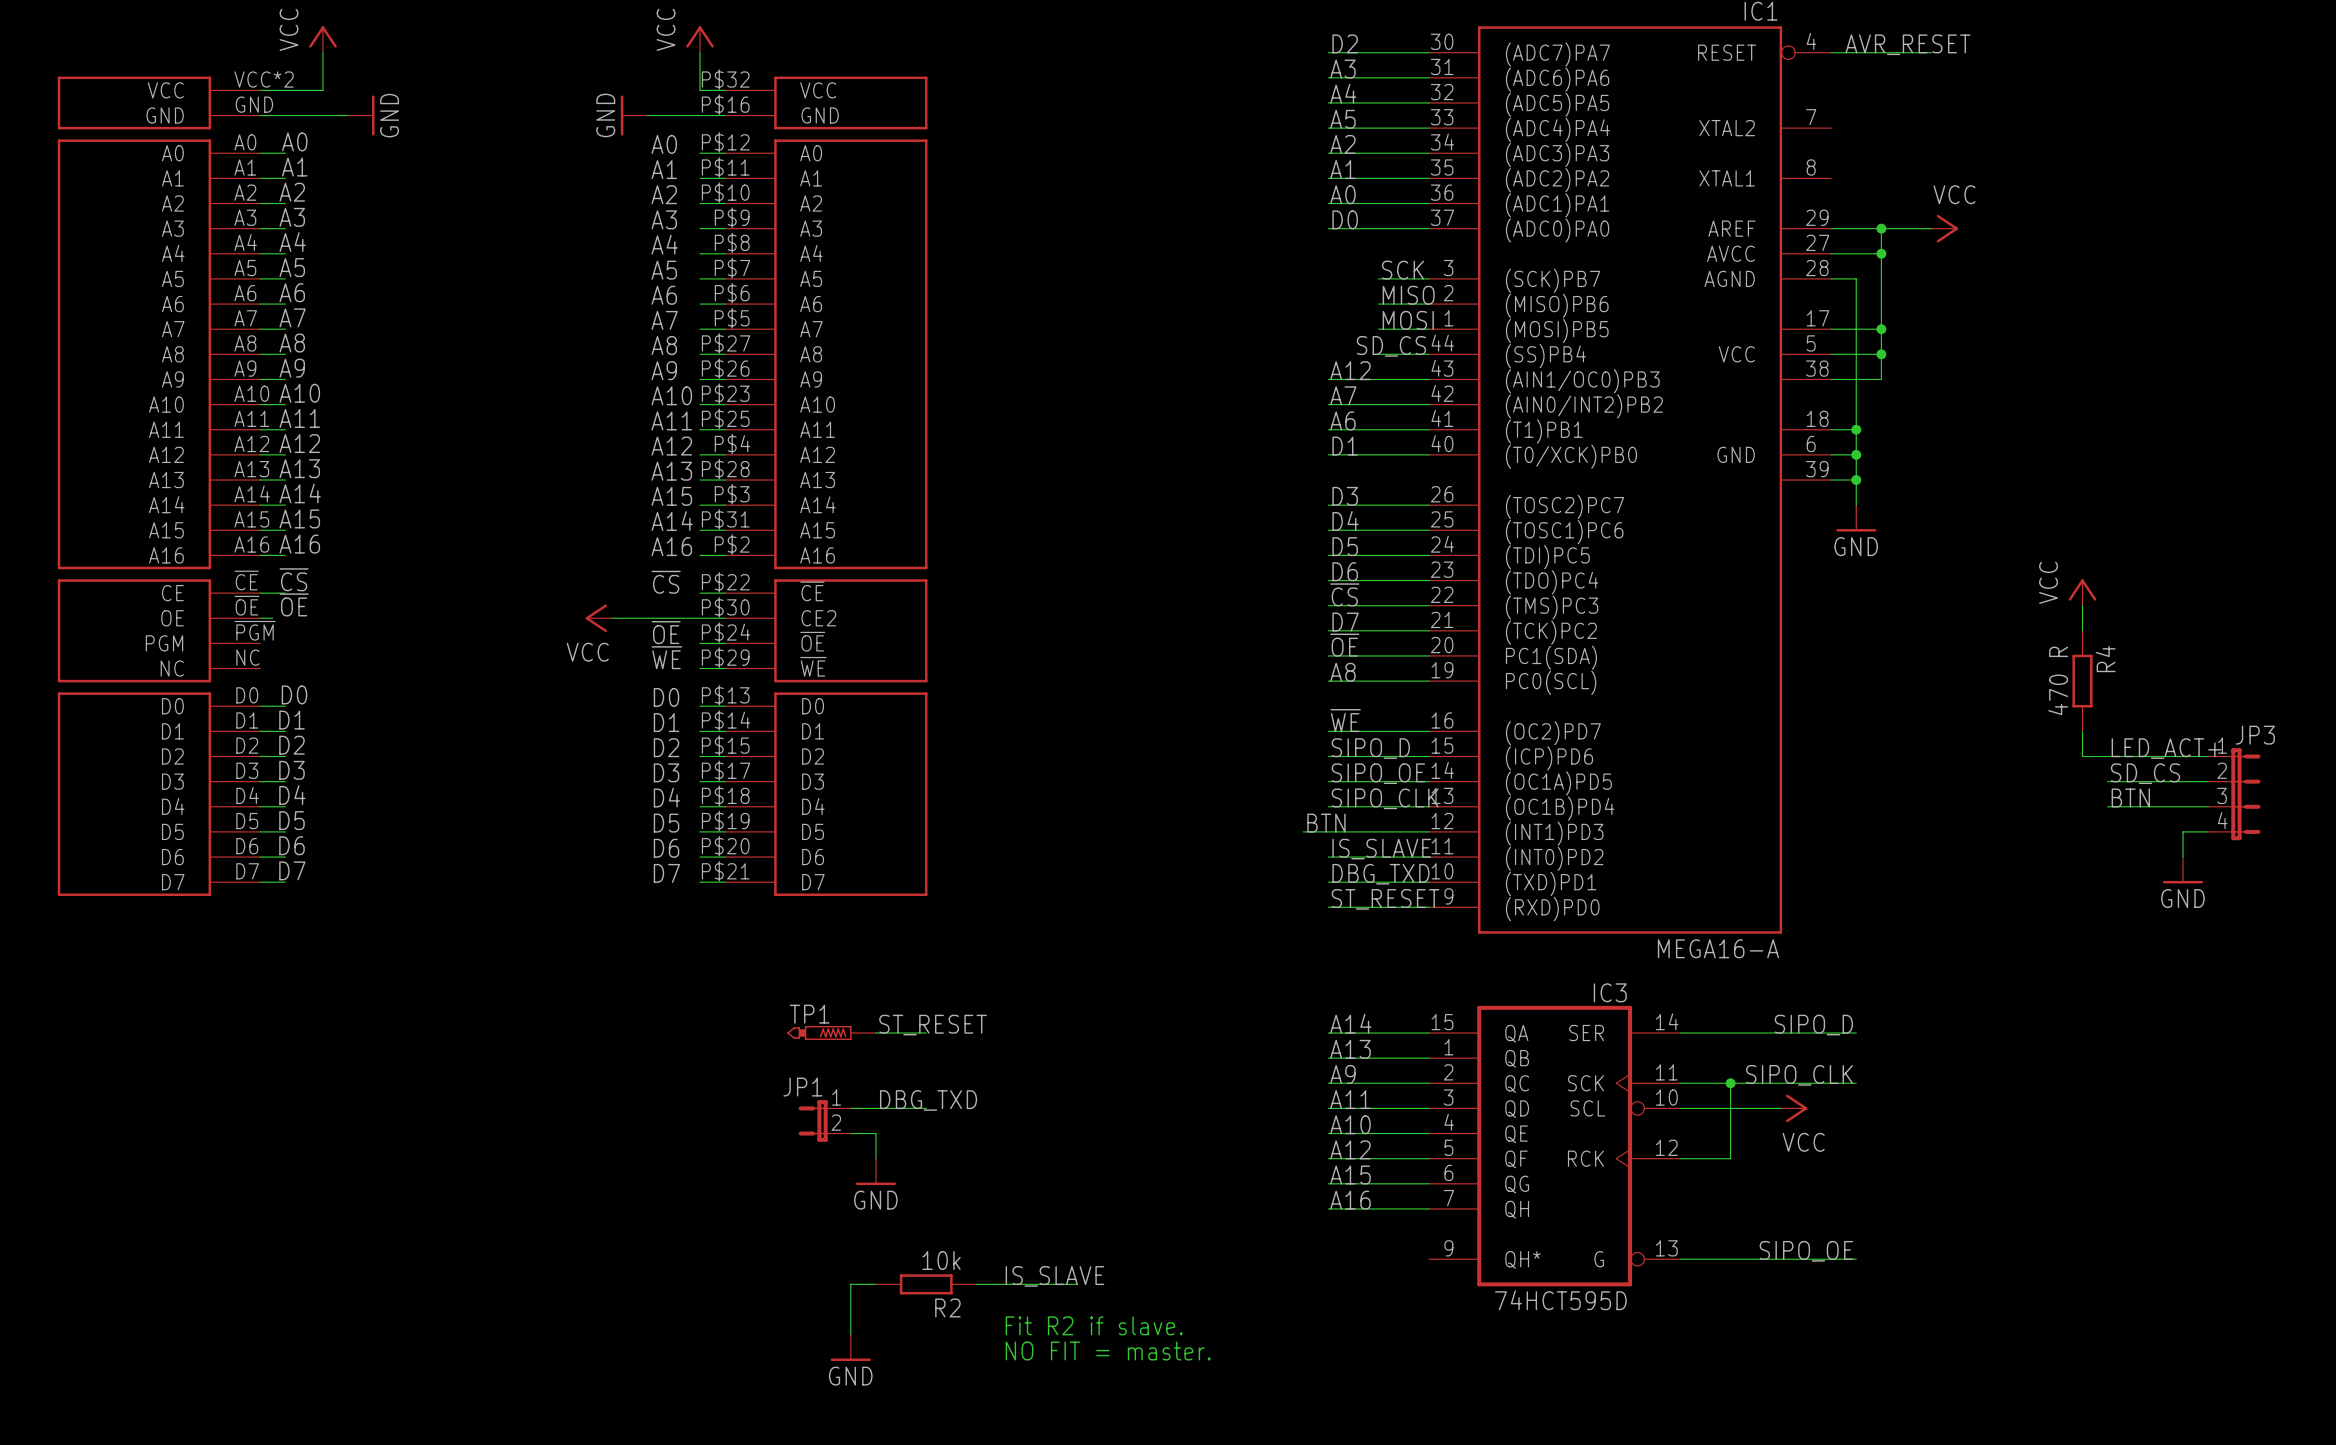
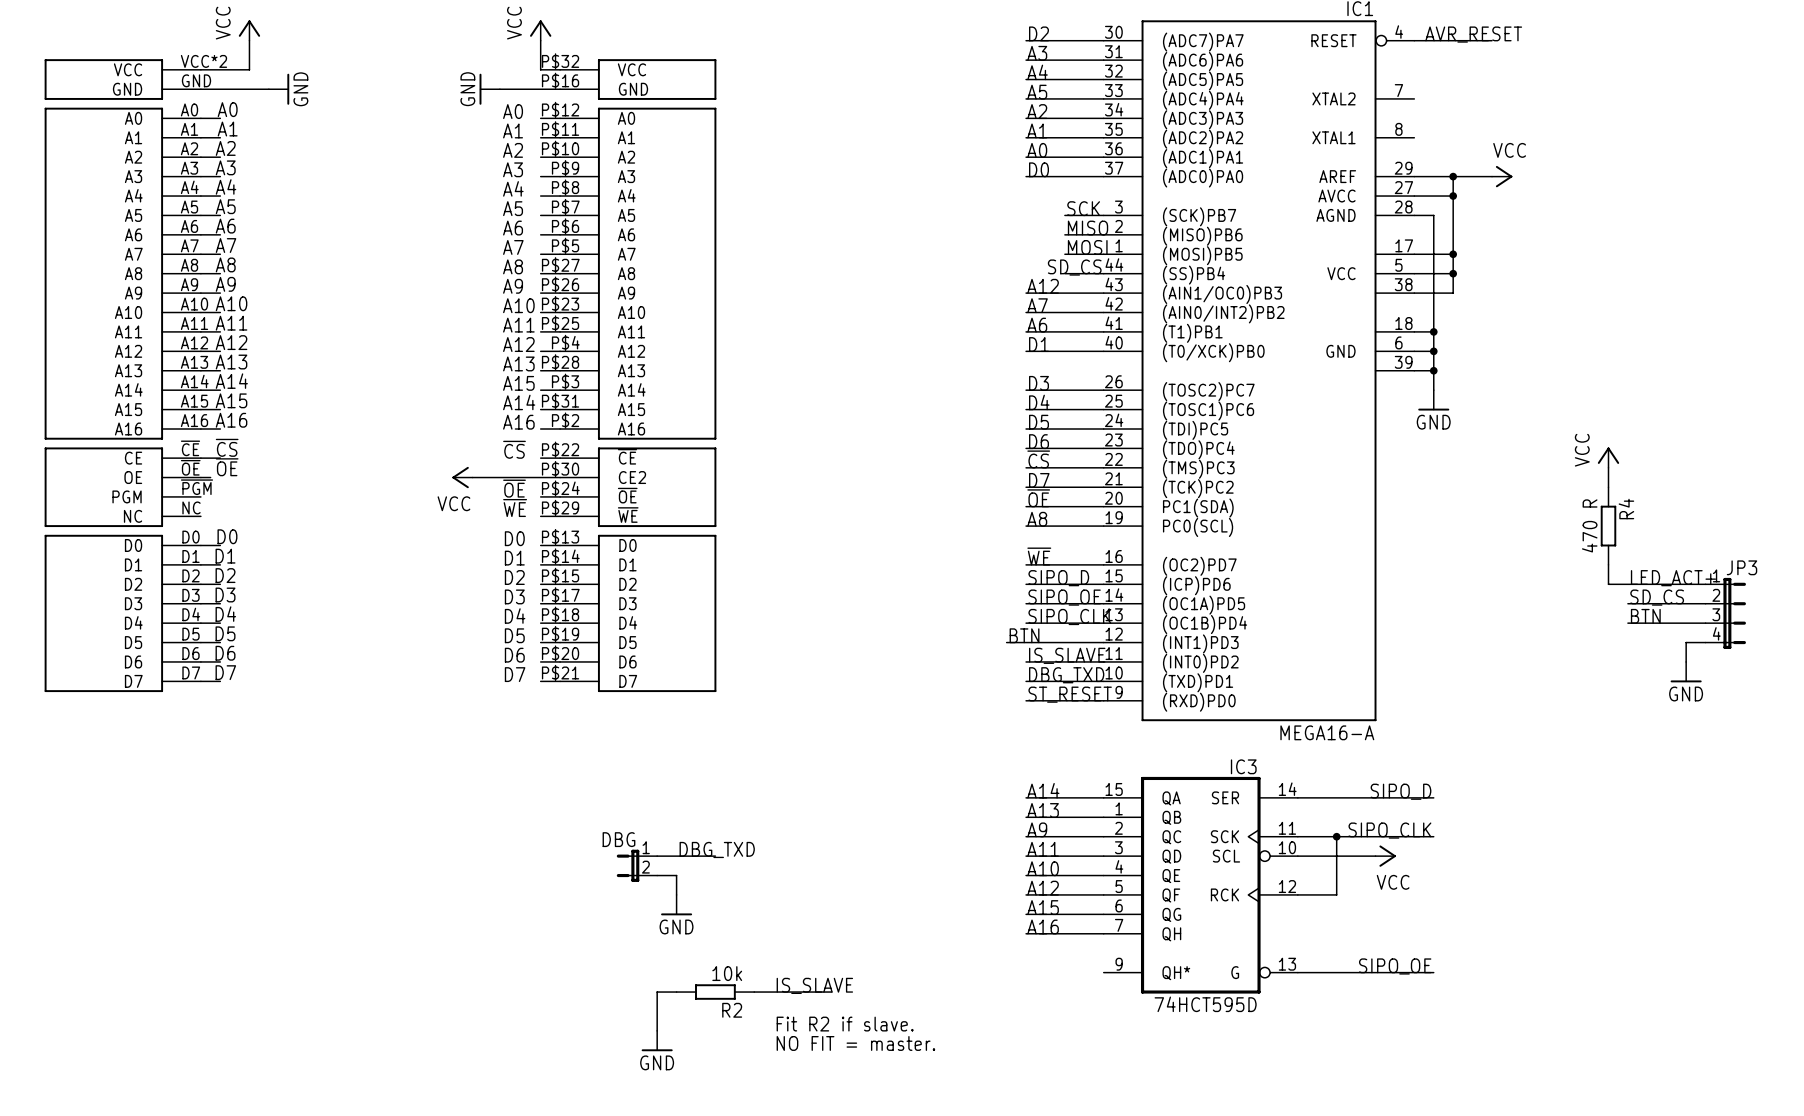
label: ST_RESET (933, 1025) -> none
TP1: (831, 1033) -> none
wire: (875, 1033) (926, 1033) -> none
JP1 name: JP1 (802, 1087) -> DBG (618, 839)

